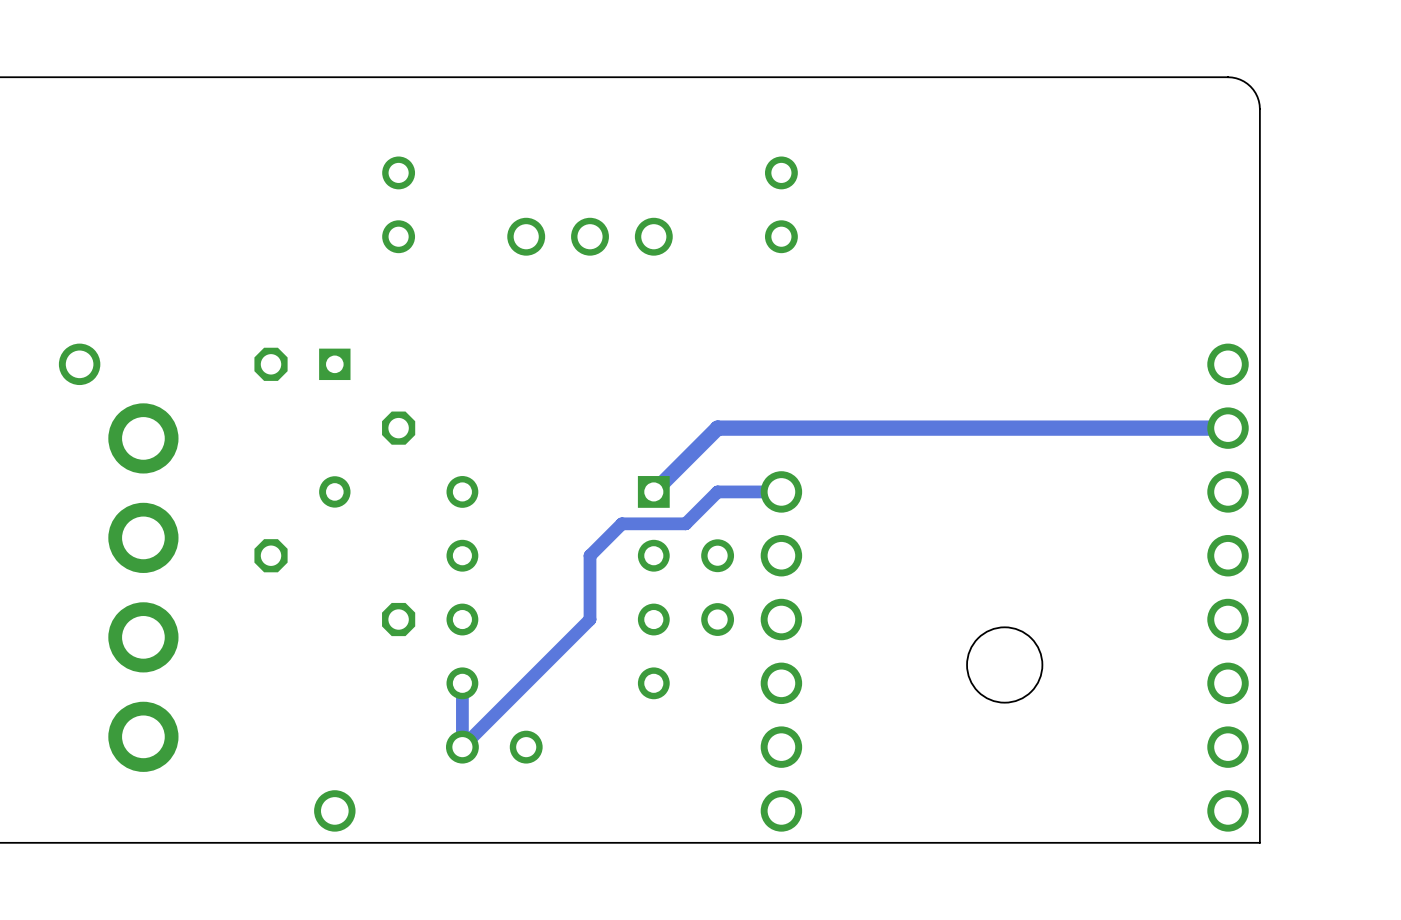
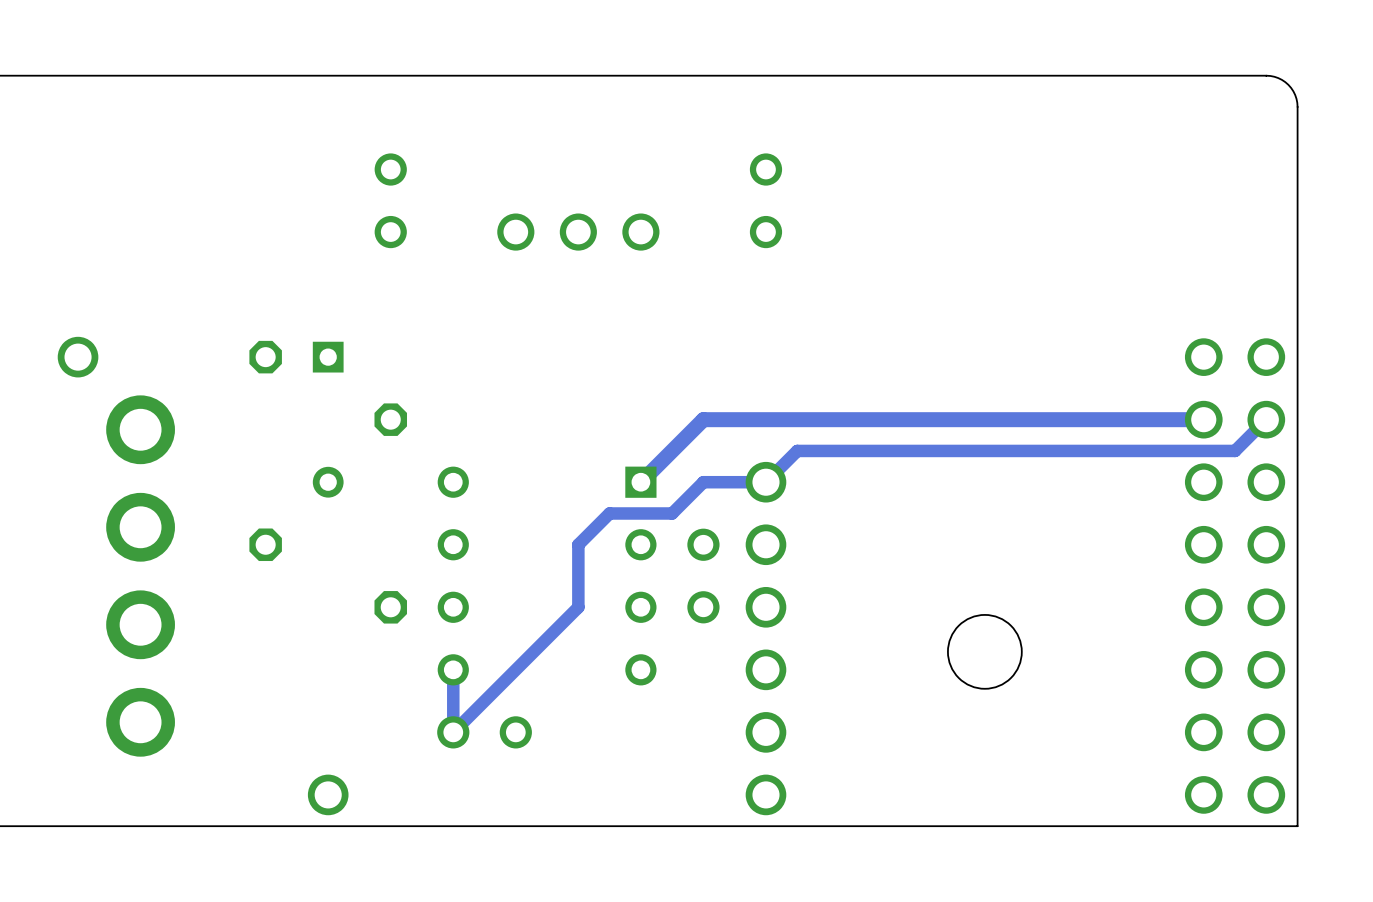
board edge: (1228, 77) (1240, 79) (1250, 86) (1257, 96) (1259, 109) (1259, 842) -> (1203, 75) (1274, 76) (1281, 79) (1291, 87) (1296, 98) (1297, 106) (1297, 826) (1235, 826)
track: none -> (1266, 419) (1235, 450) (797, 450) (765, 482)
part: (1228, 587) -> none
part: none -> (1235, 576)

